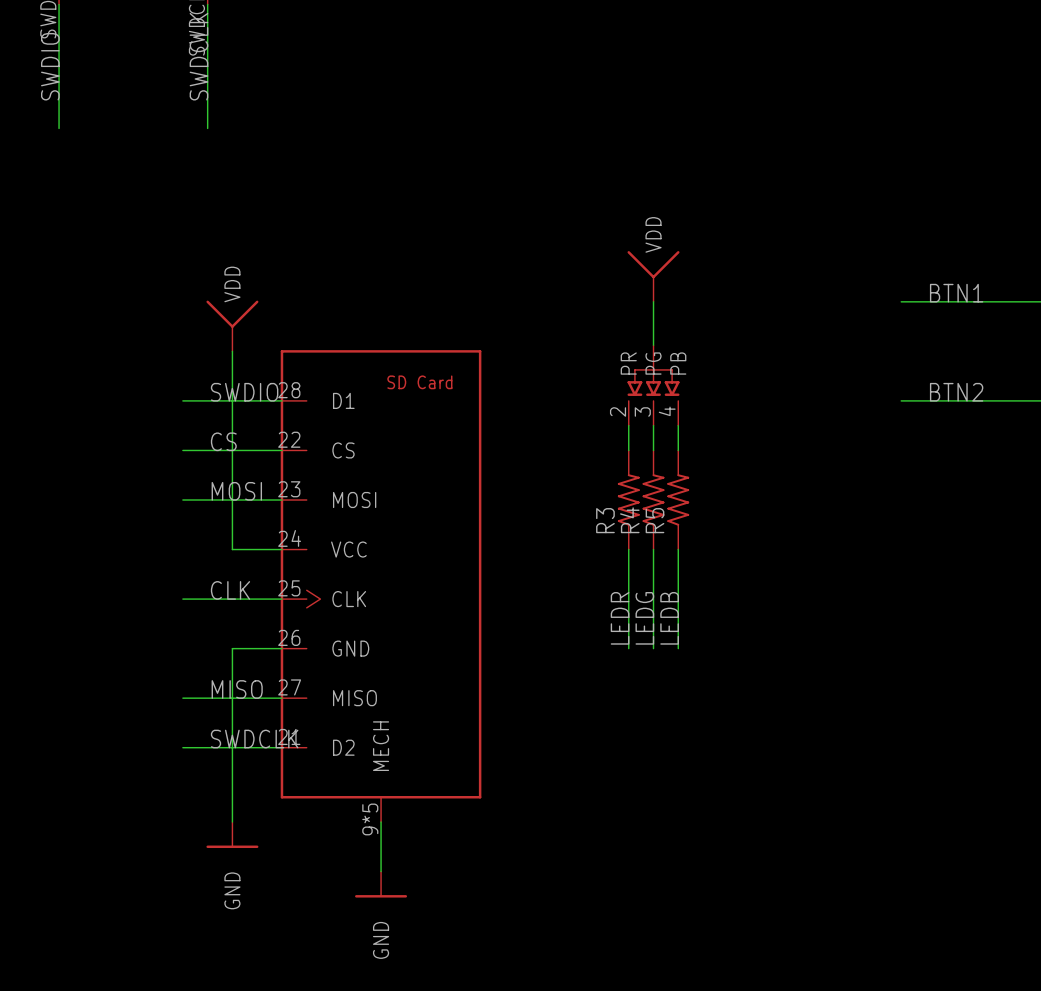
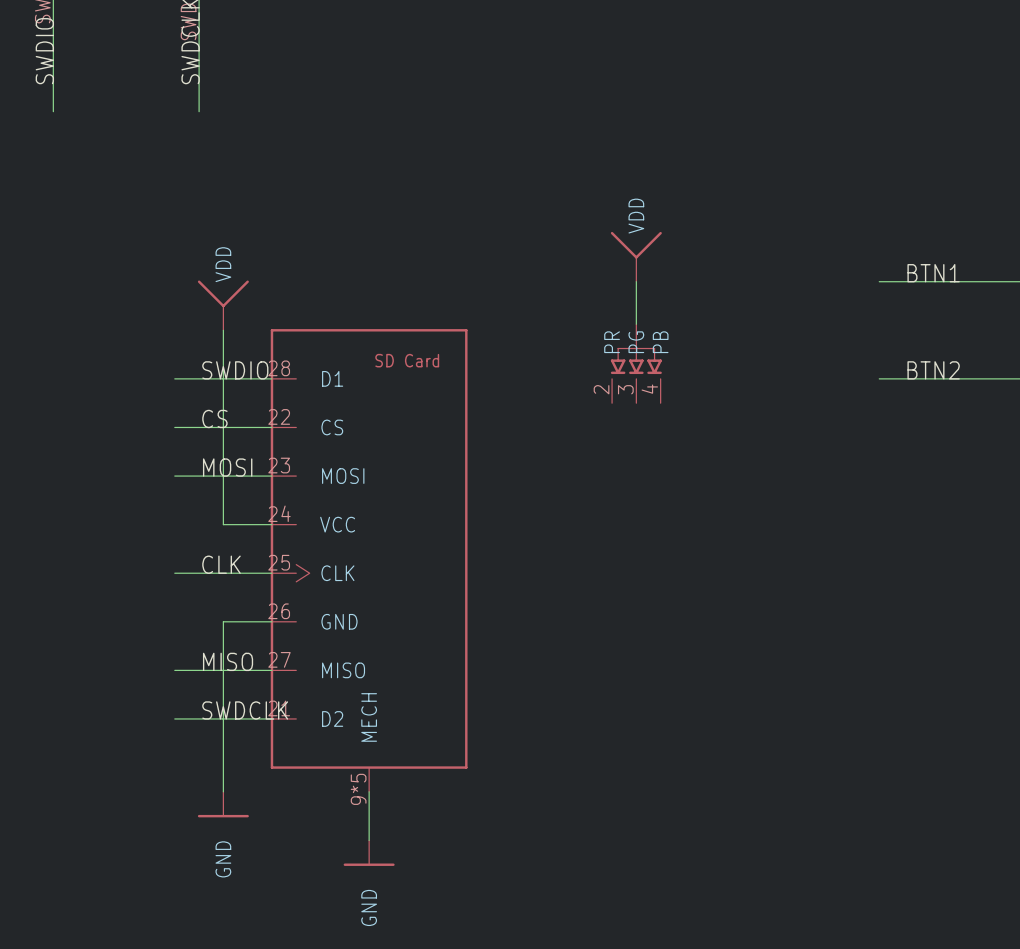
wire: (628, 425) (628, 450) -> none
wire: (653, 425) (653, 450) -> none
wire: (678, 425) (678, 450) -> none
R3: (628, 500) -> none
R4: (653, 500) -> none
R5: (678, 500) -> none
wire: (628, 549) (628, 648) -> none
wire: (653, 549) (653, 648) -> none
wire: (678, 549) (678, 648) -> none
label: LEDR (620, 618) -> none
label: LEDG (644, 618) -> none
label: LEDB (669, 618) -> none

